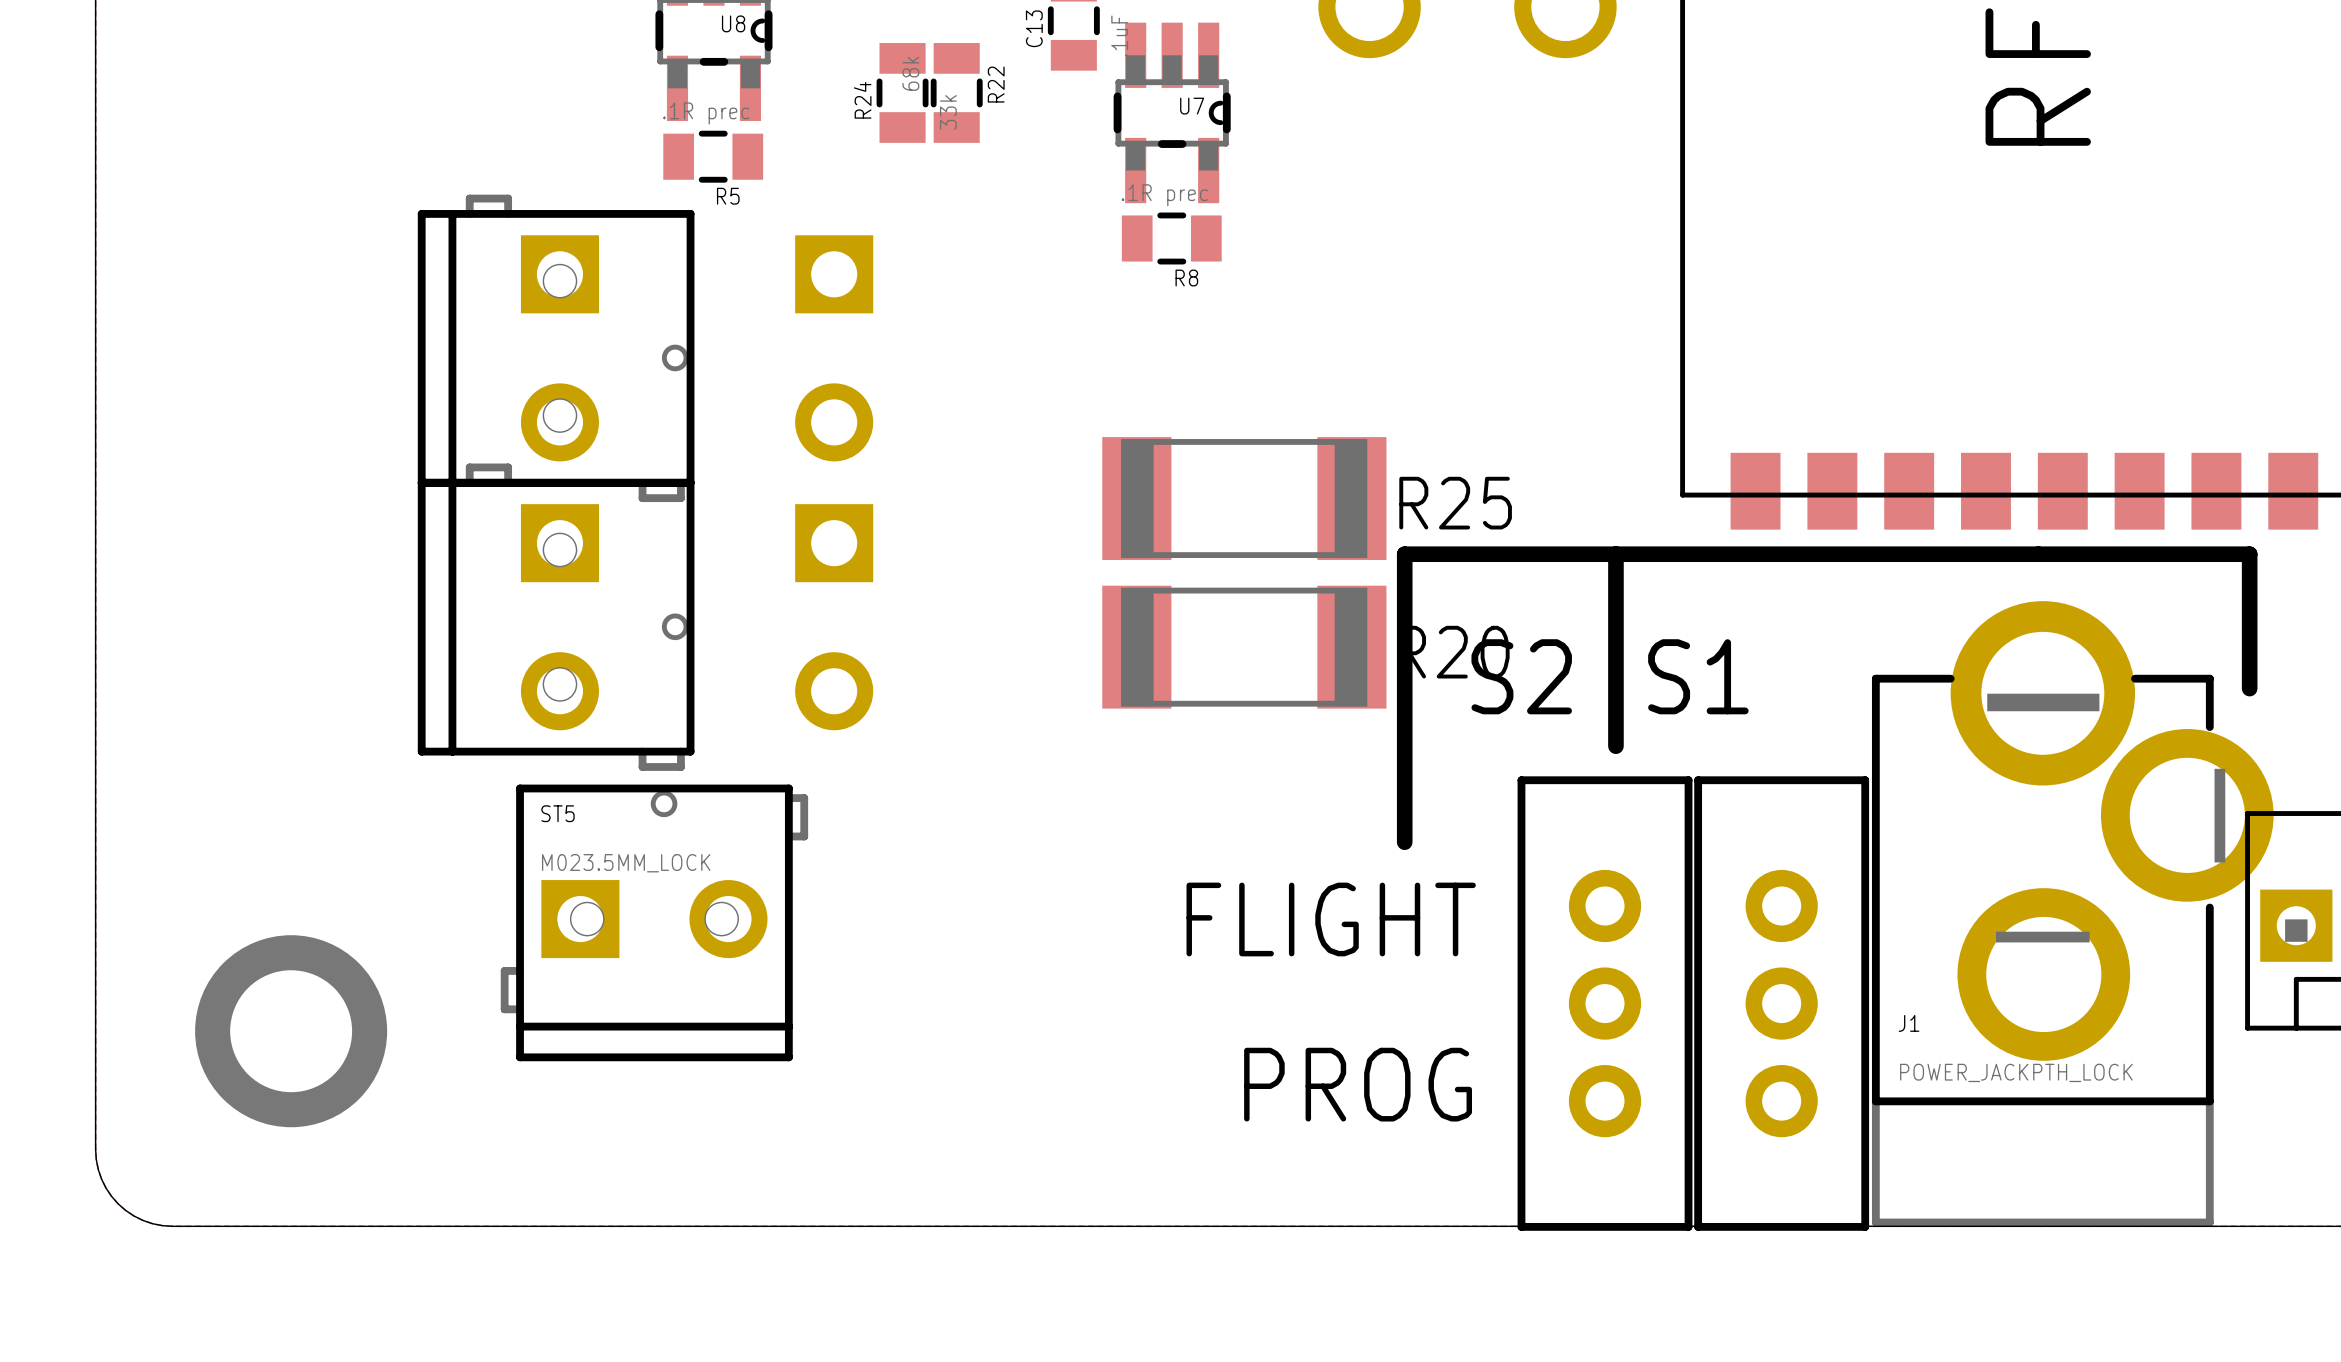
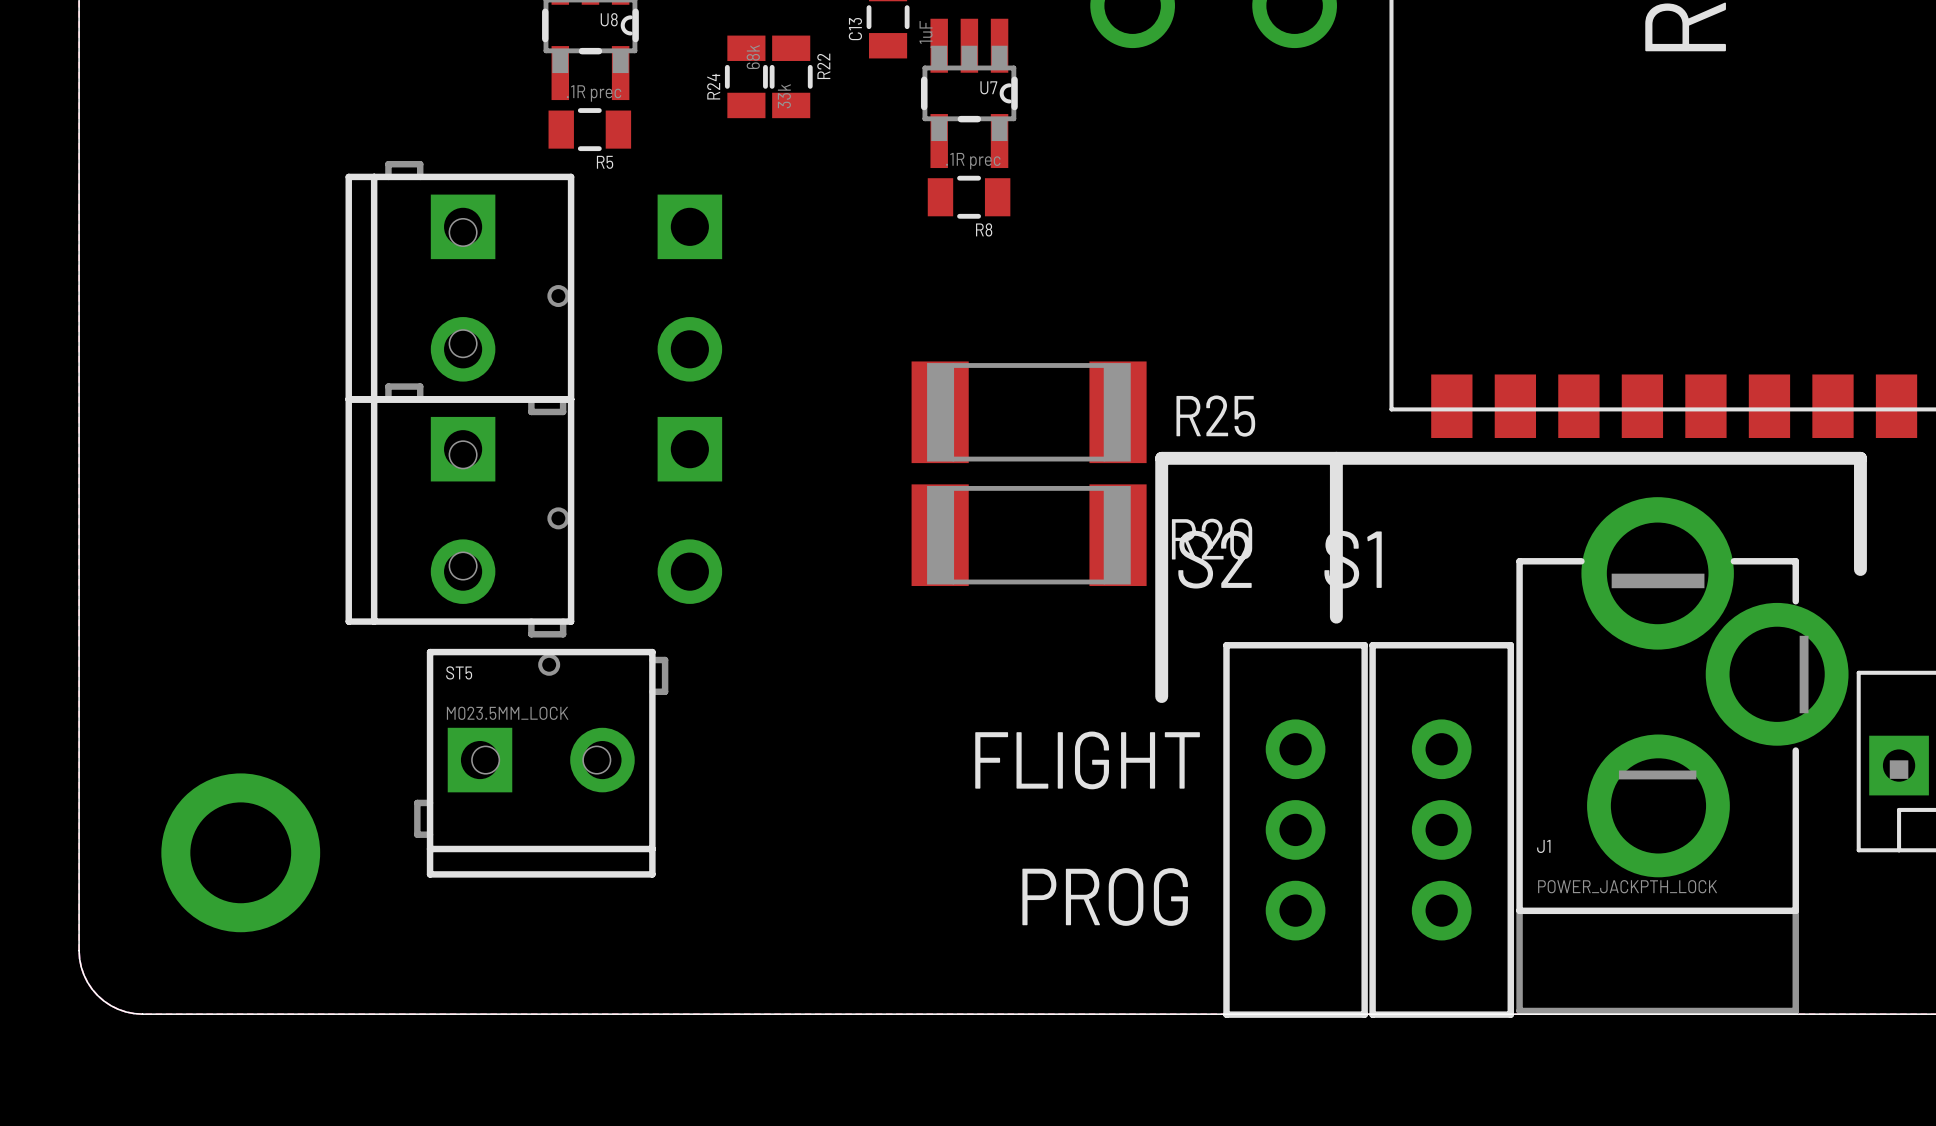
J1 position: (2072, 913) -> (1682, 755)
S2 position: (1605, 1003) -> (1295, 829)
S1 position: (1781, 1003) -> (1441, 829)

